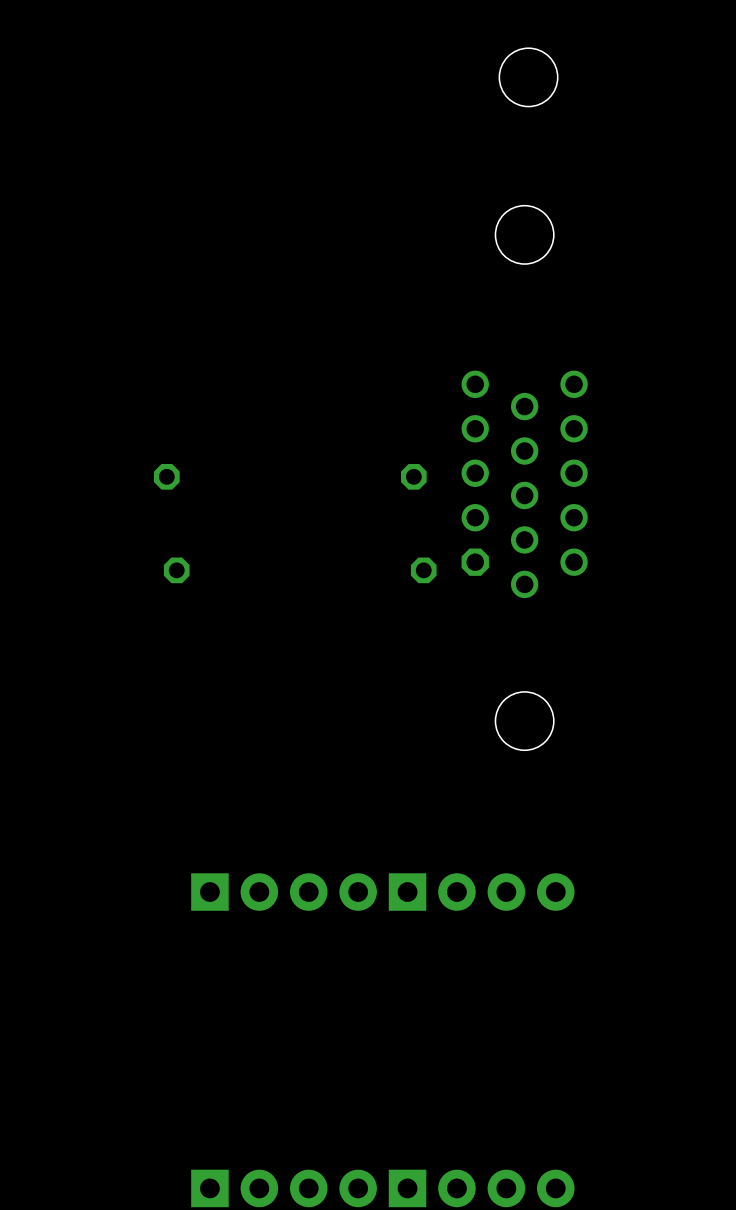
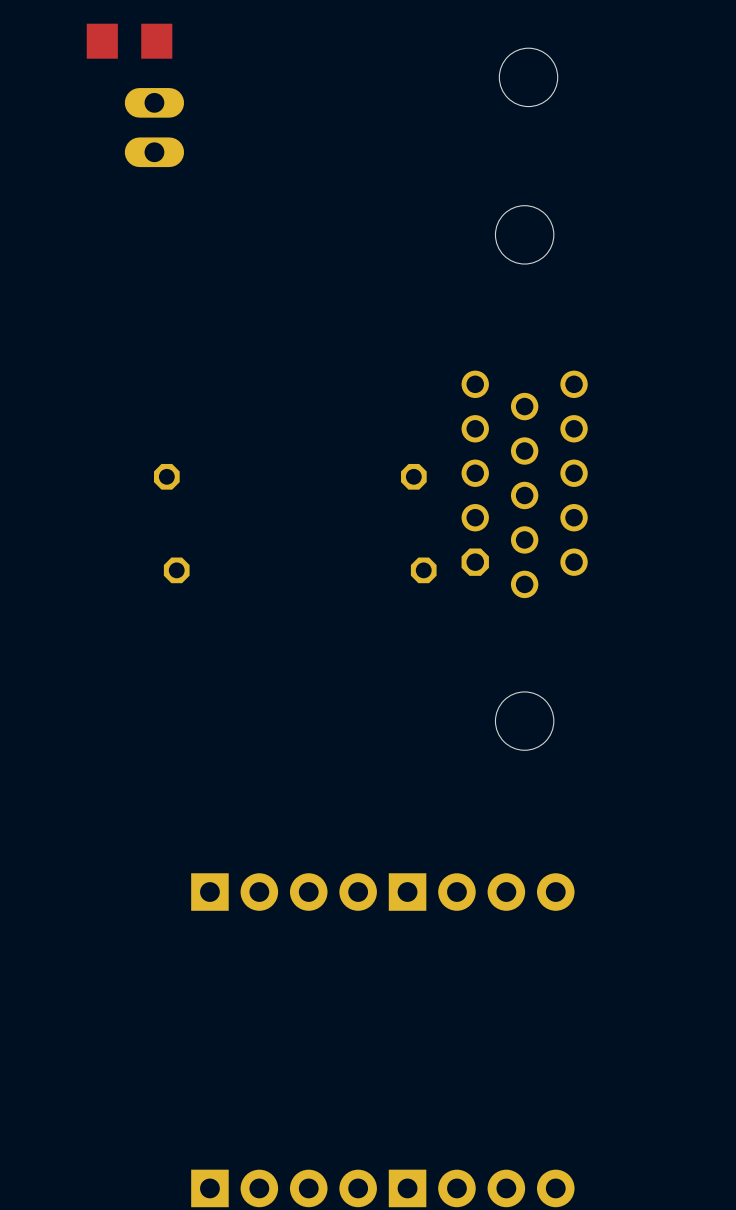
part: none -> (129, 41)
part: none -> (154, 127)

